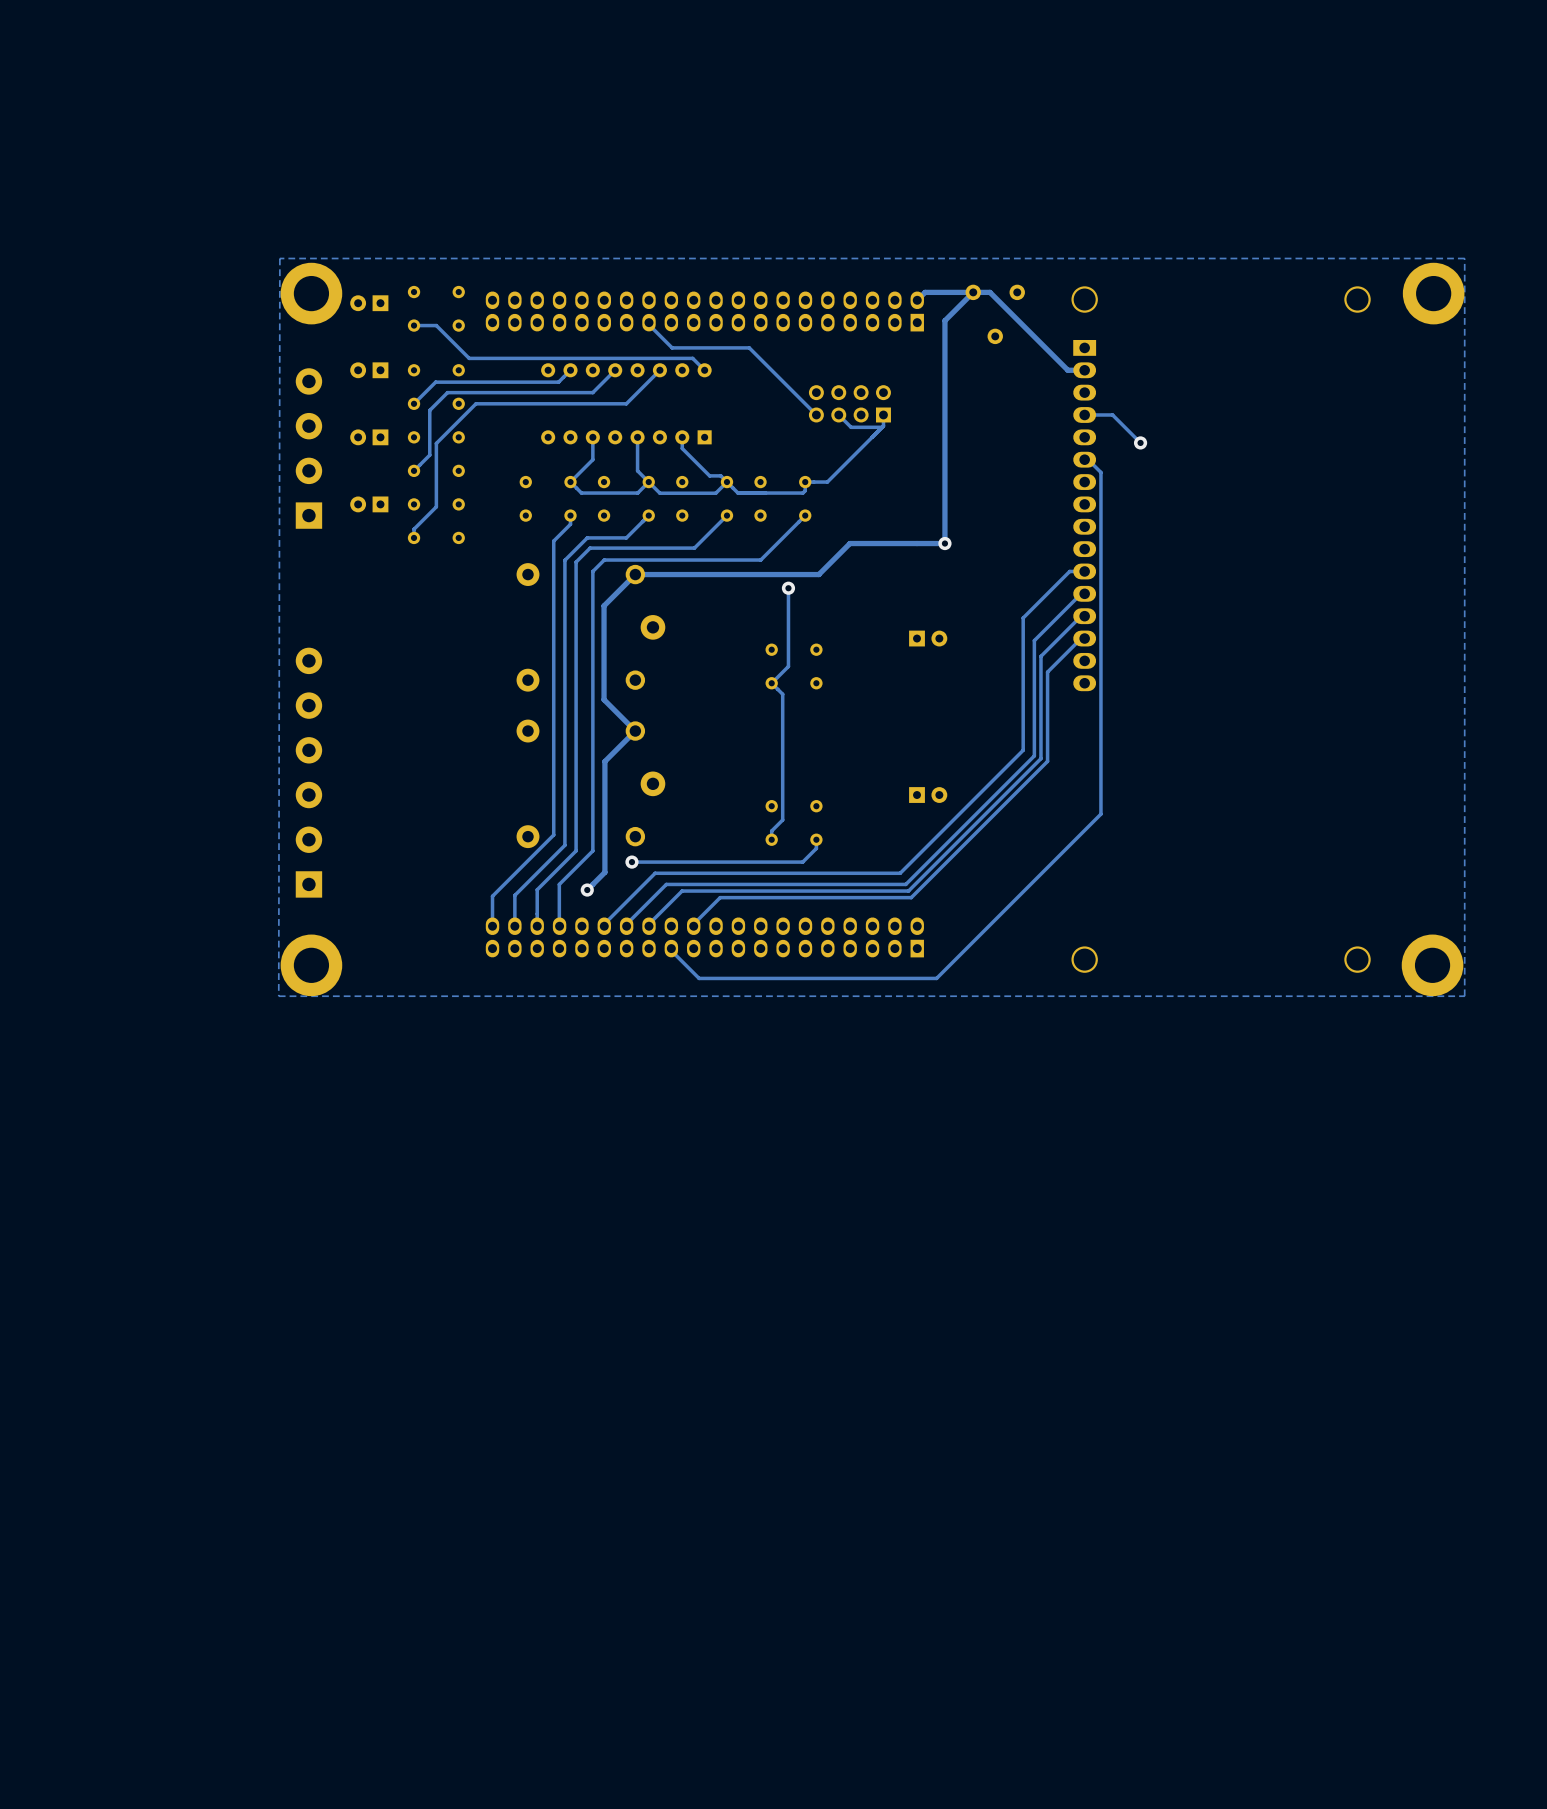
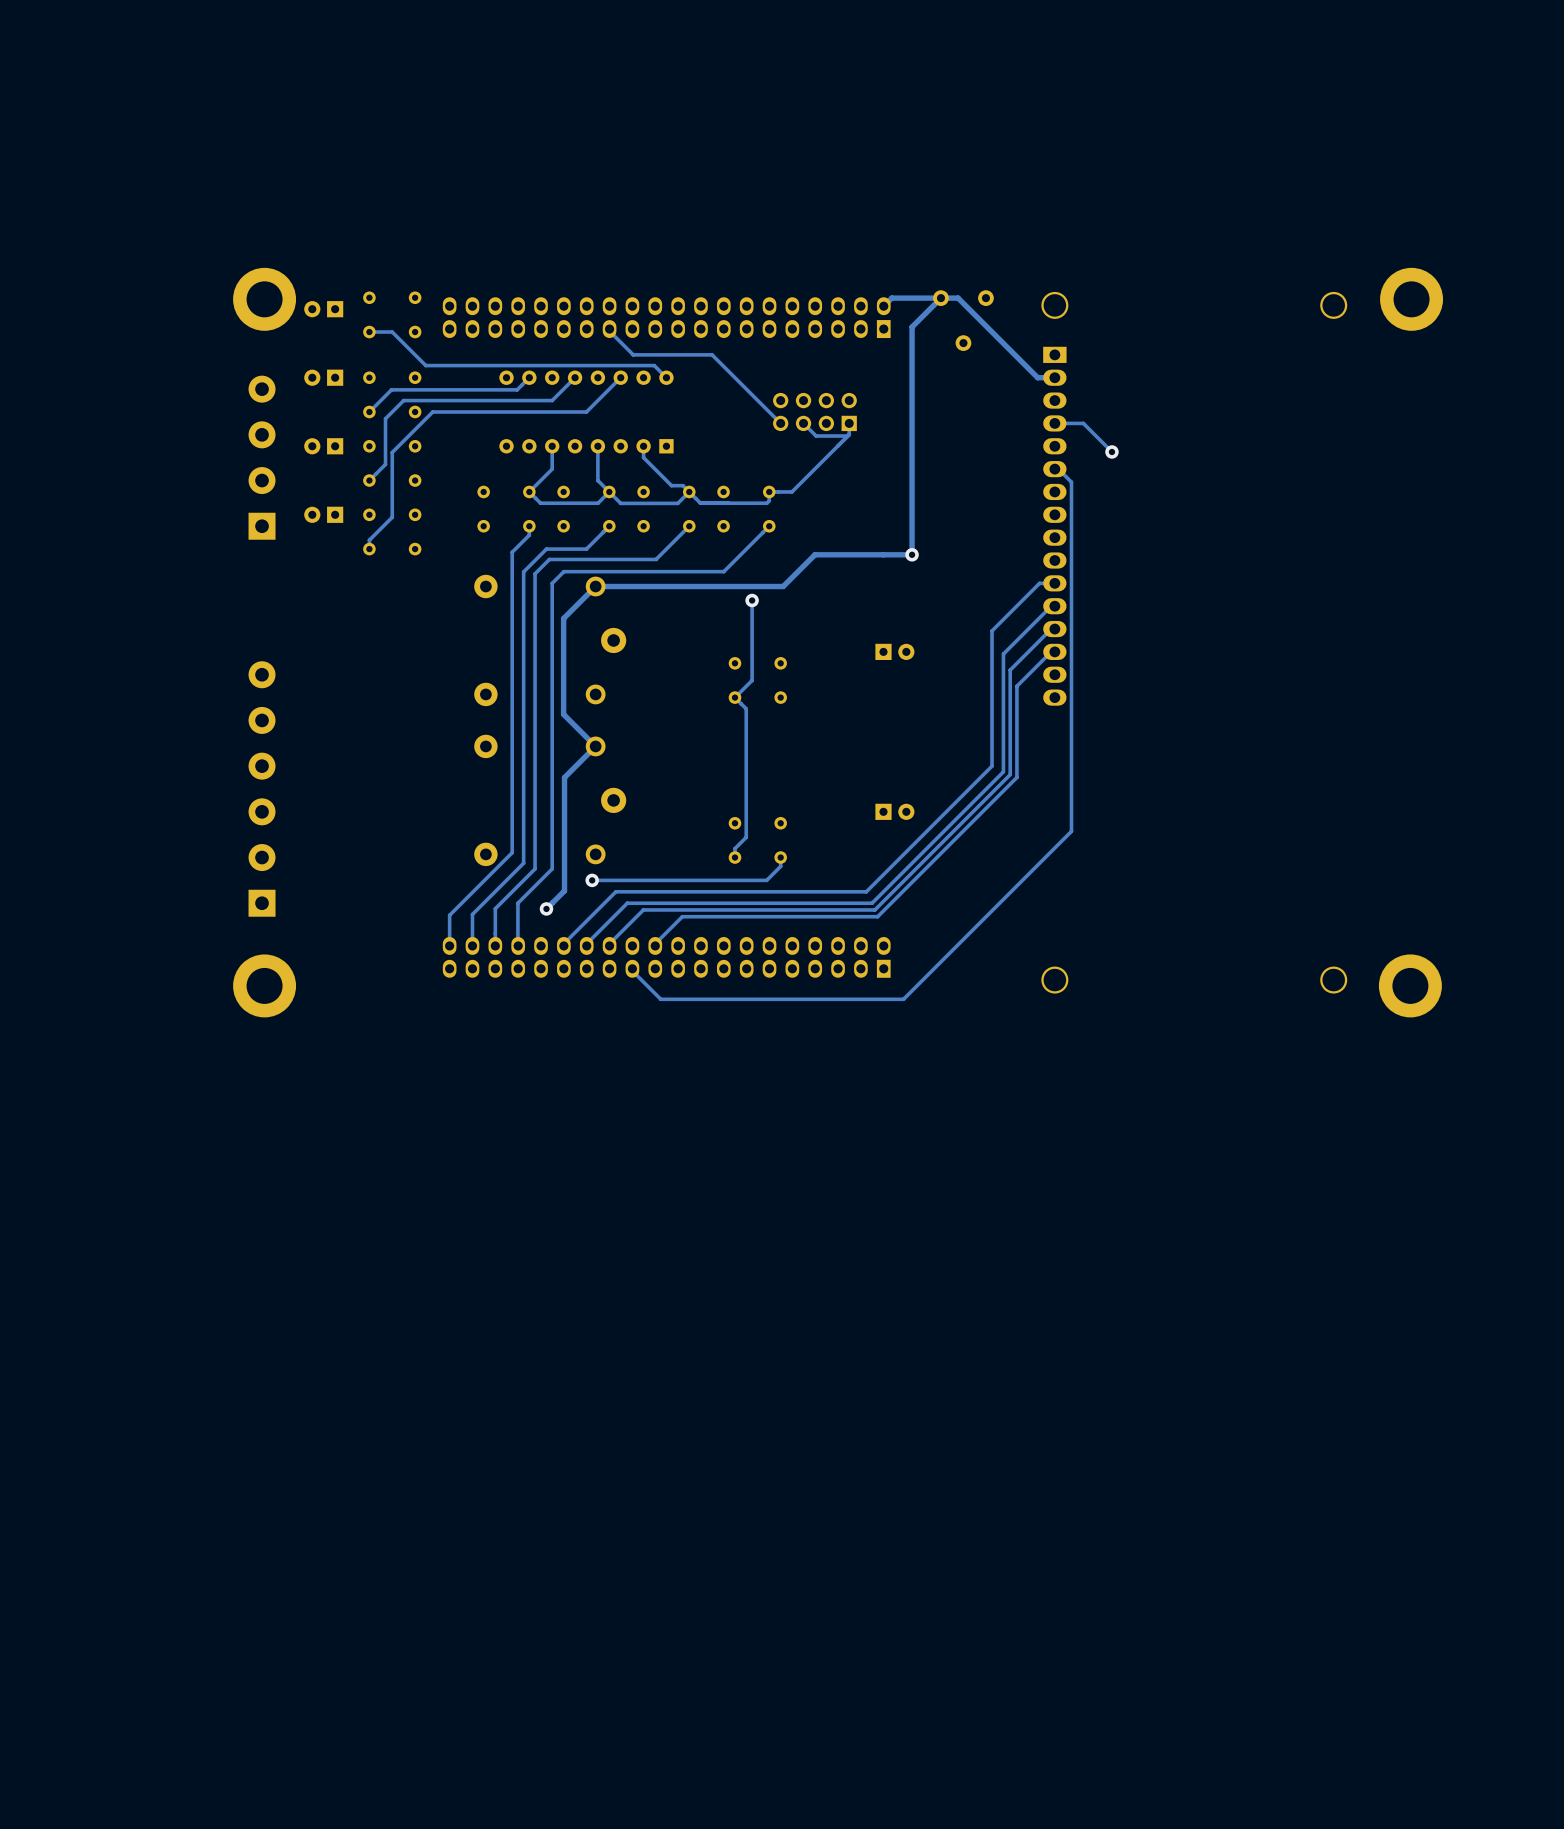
zone outline: (1464, 258) (279, 258) (278, 996) (1464, 996) (1464, 258) -> none

